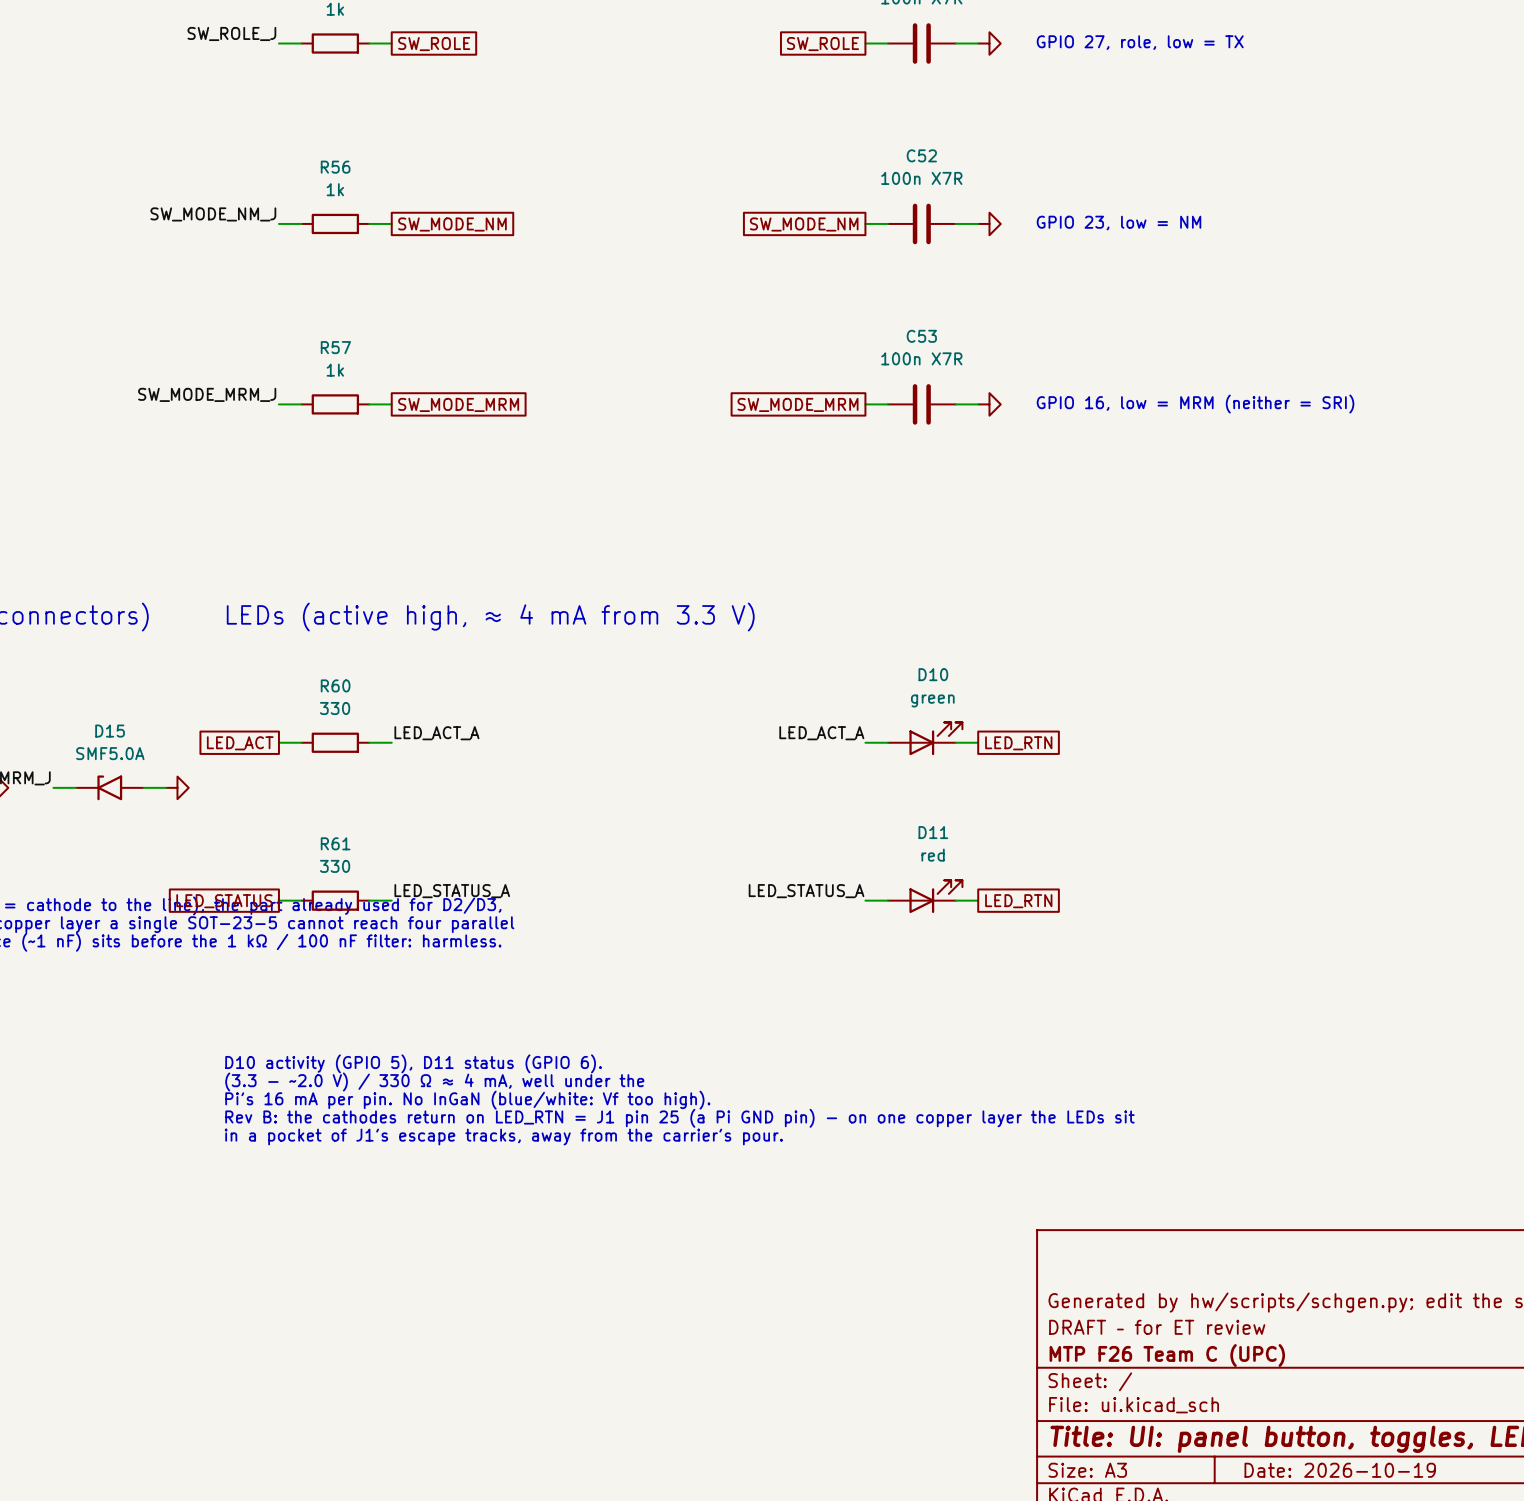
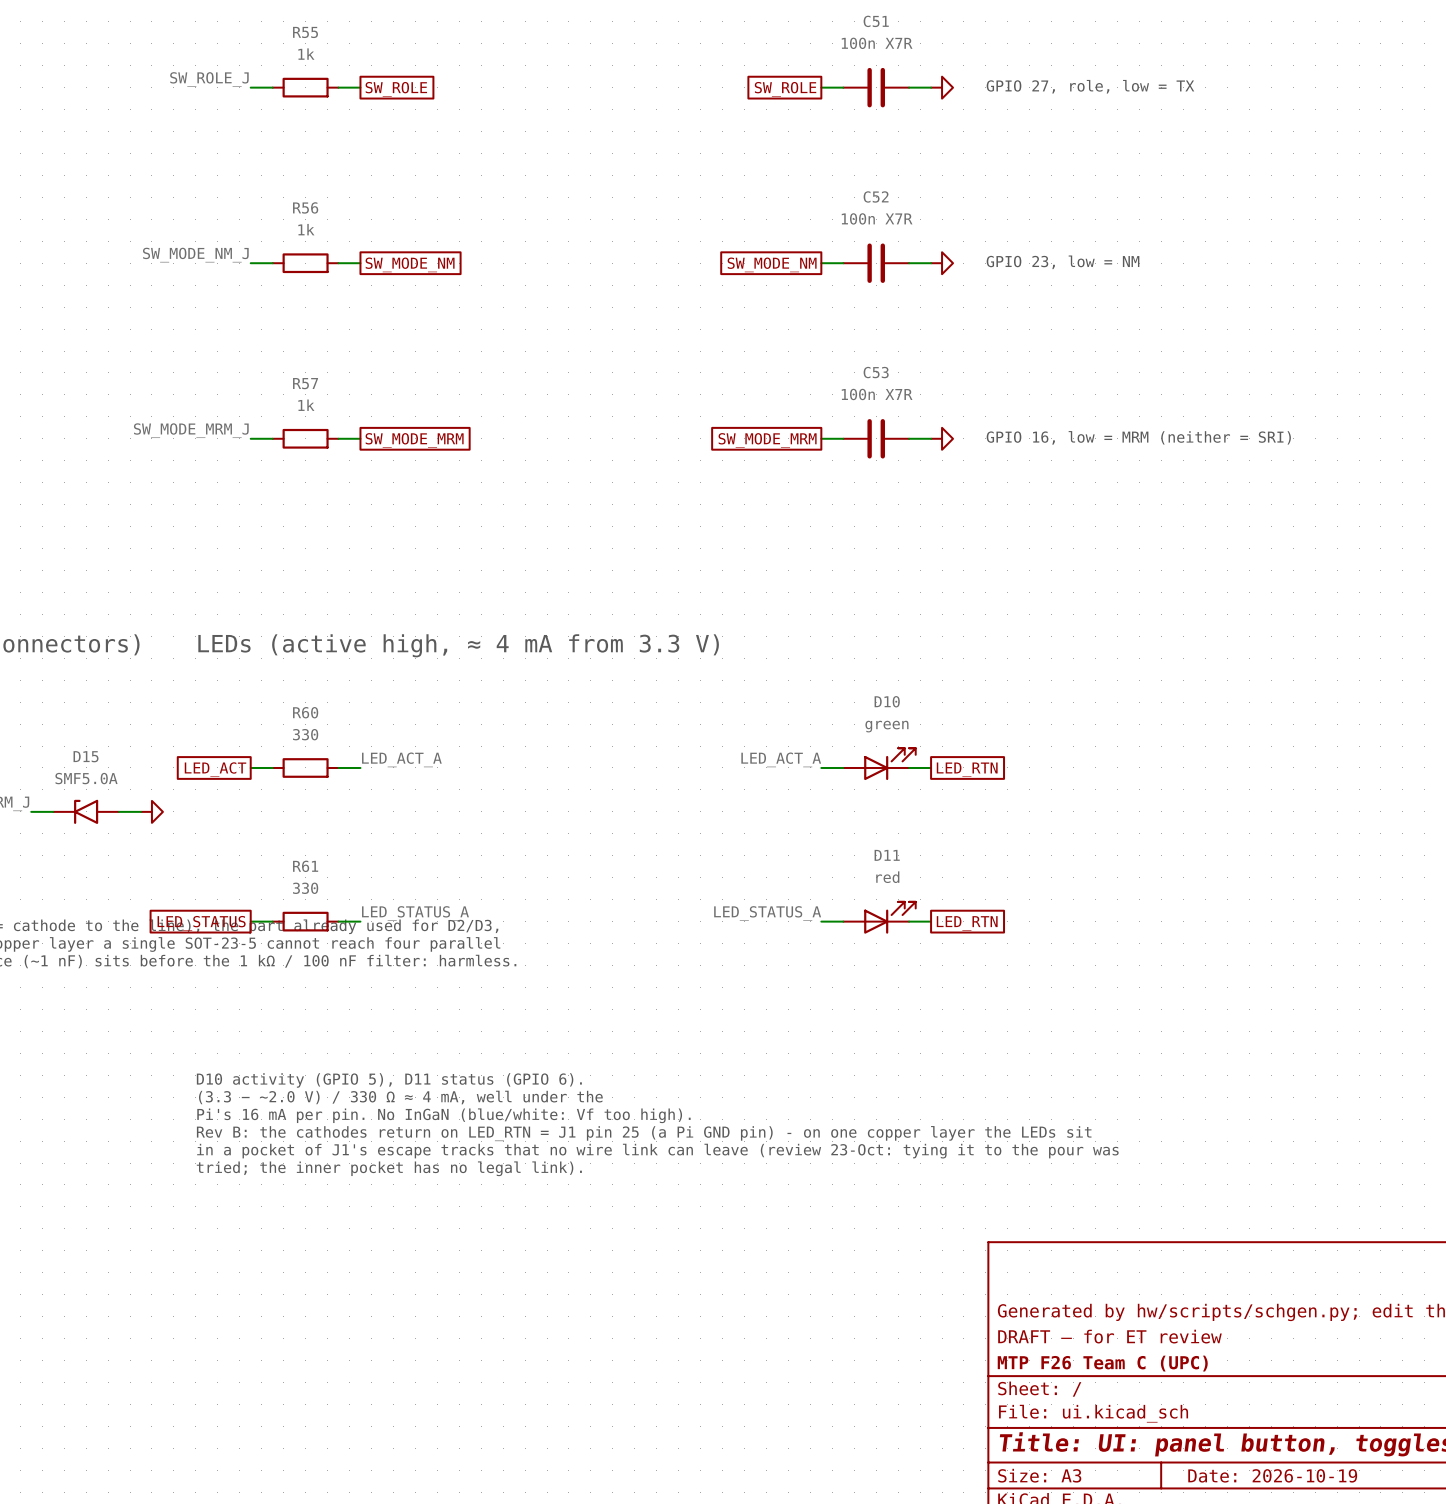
text: in a pocket of J1's escape tracks, away from the carrier's pour. (503, 1137) -> in a pocket of J1's escape tracks that no wire link can leave (review 23-Oct: tying it to the pour was (657, 1151)
text: none -> tried; the inner pocket has no legal link). (389, 1168)

